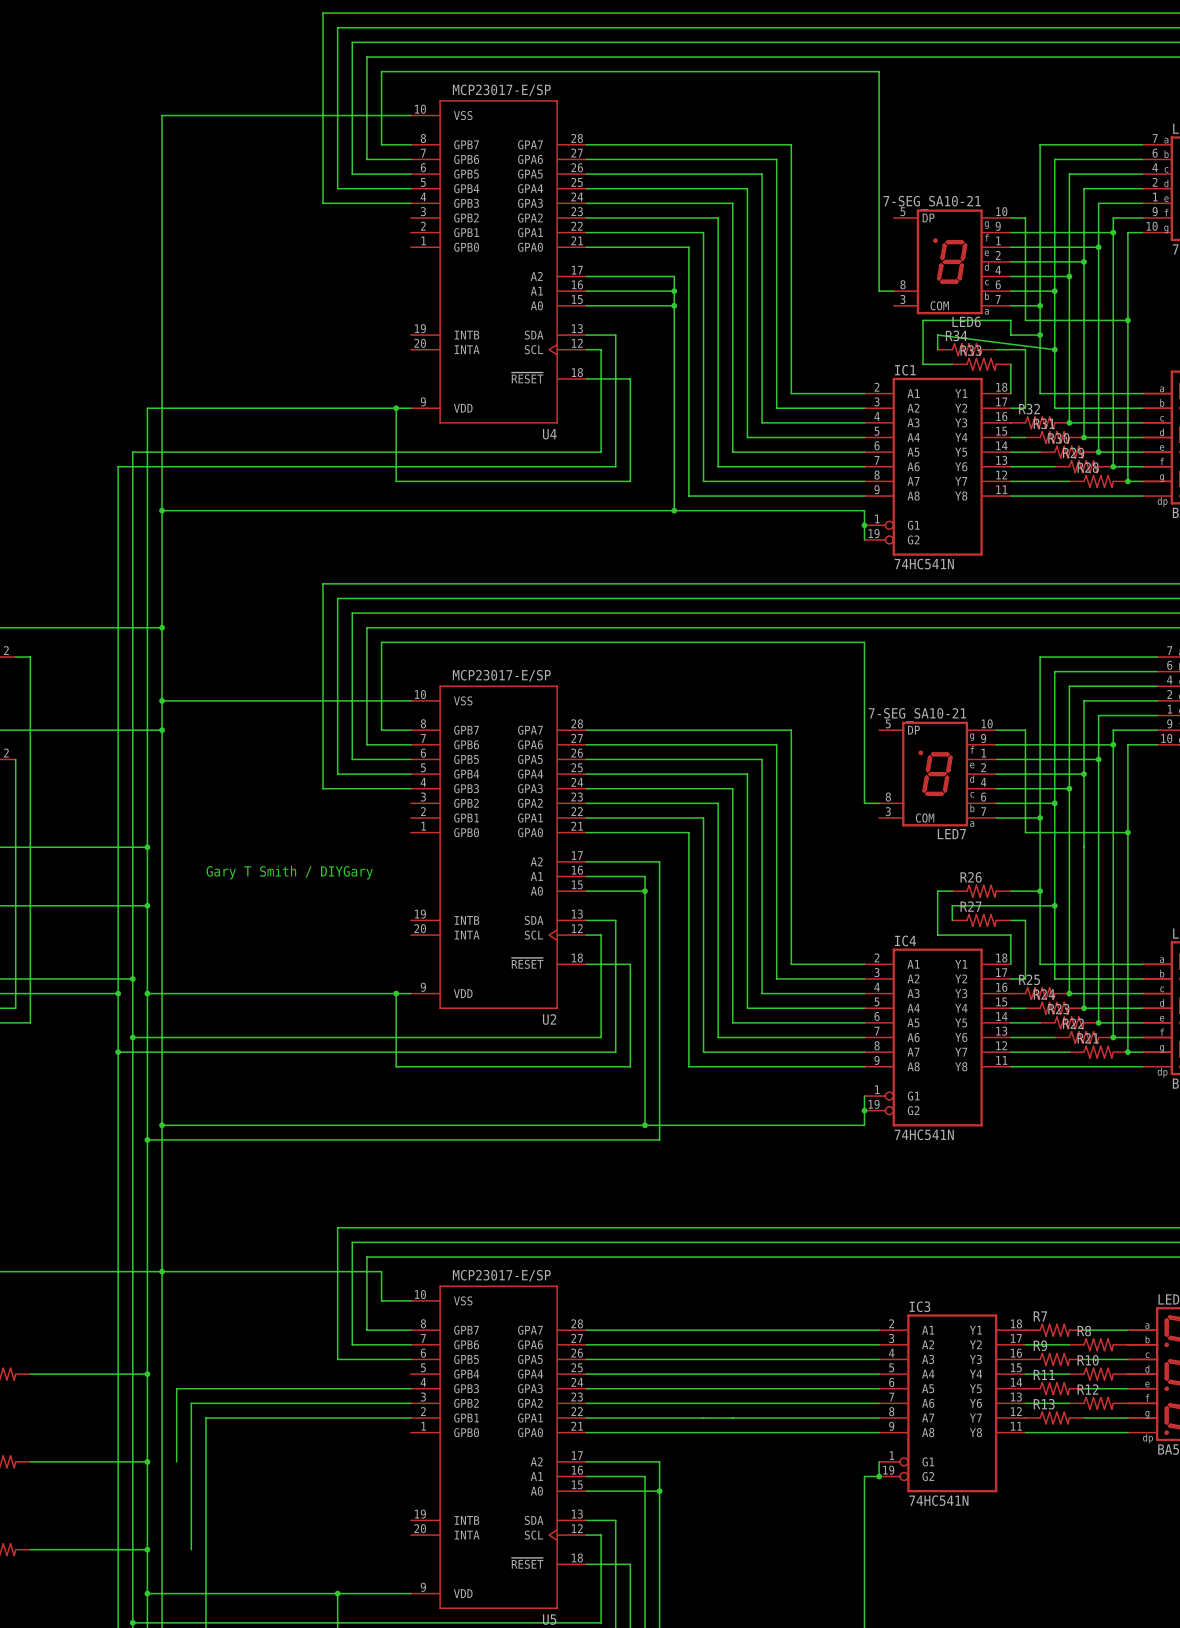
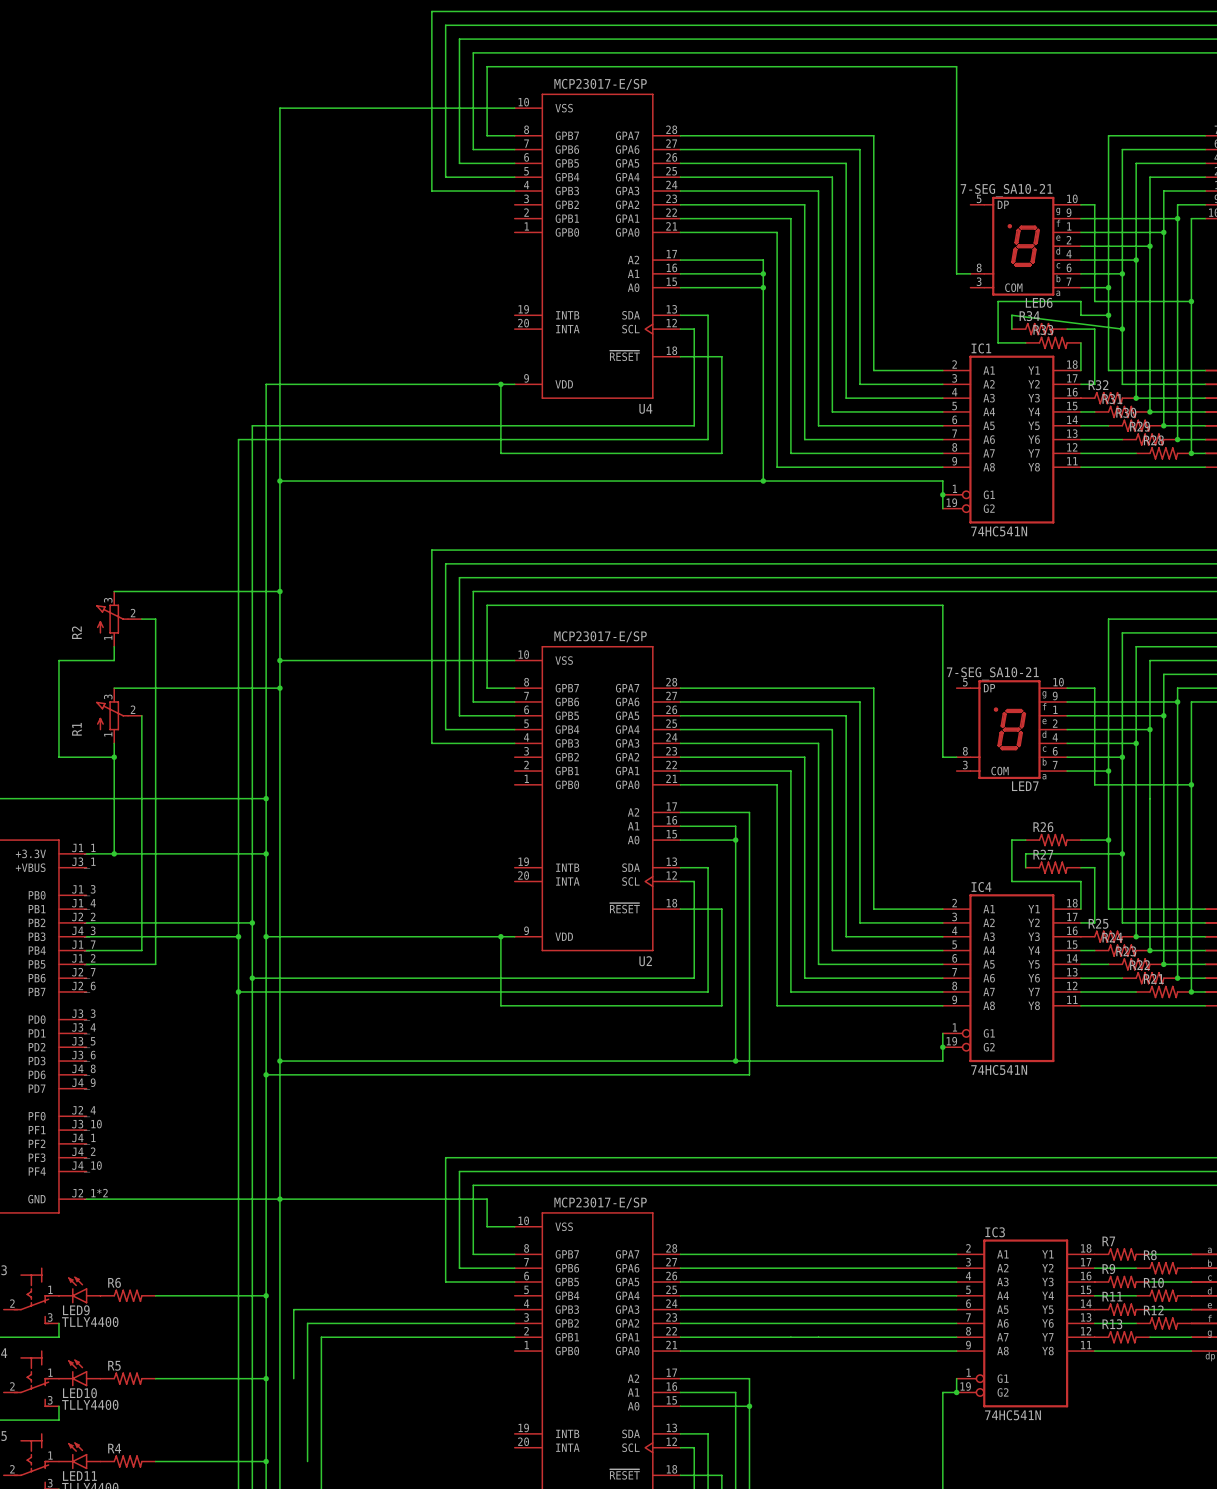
text: Gary T Smith / DIYGary (289, 872) -> none

